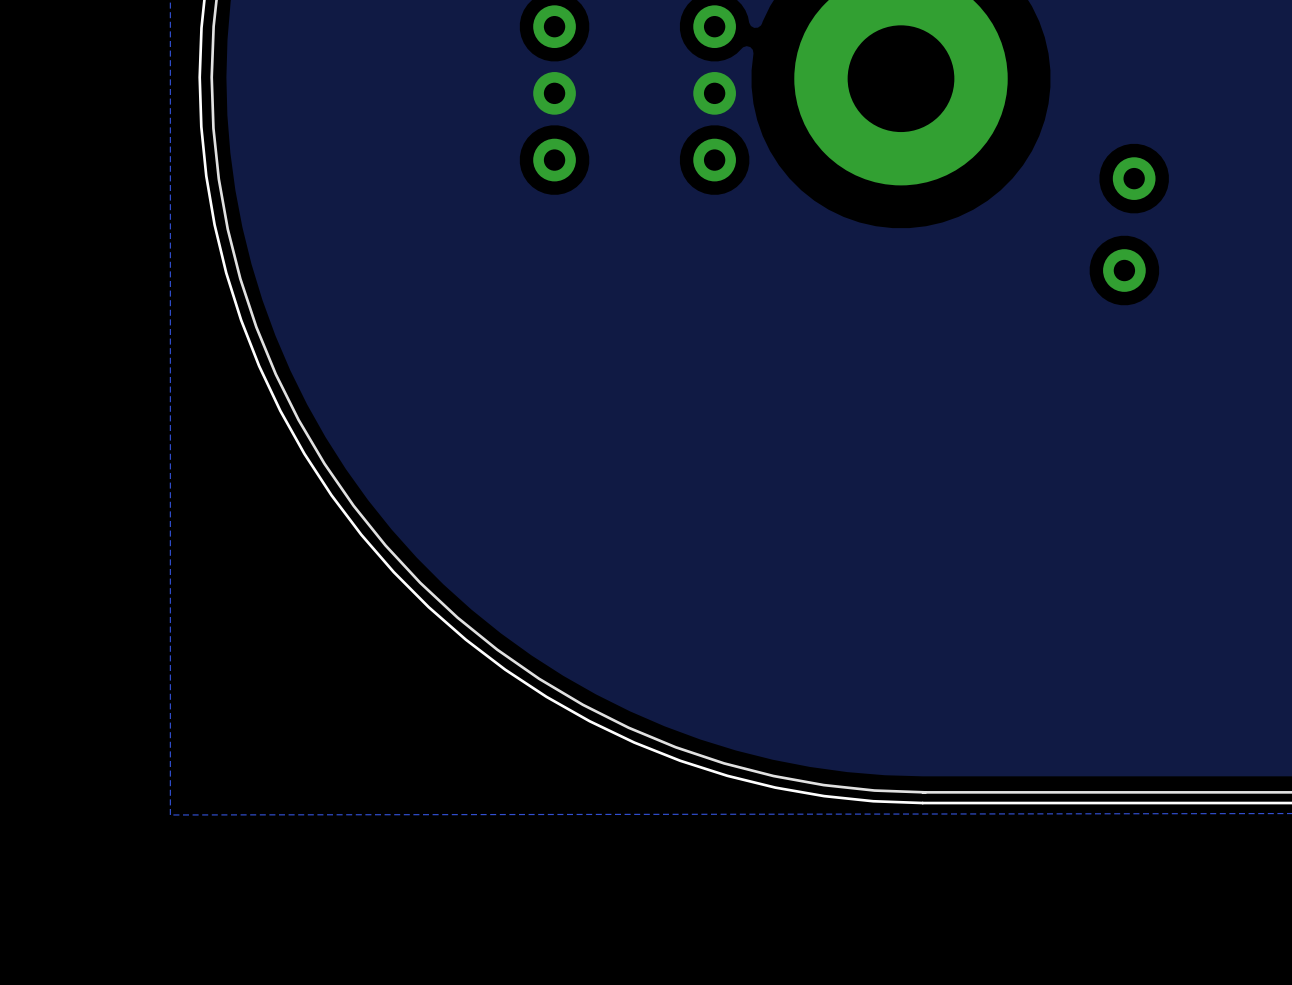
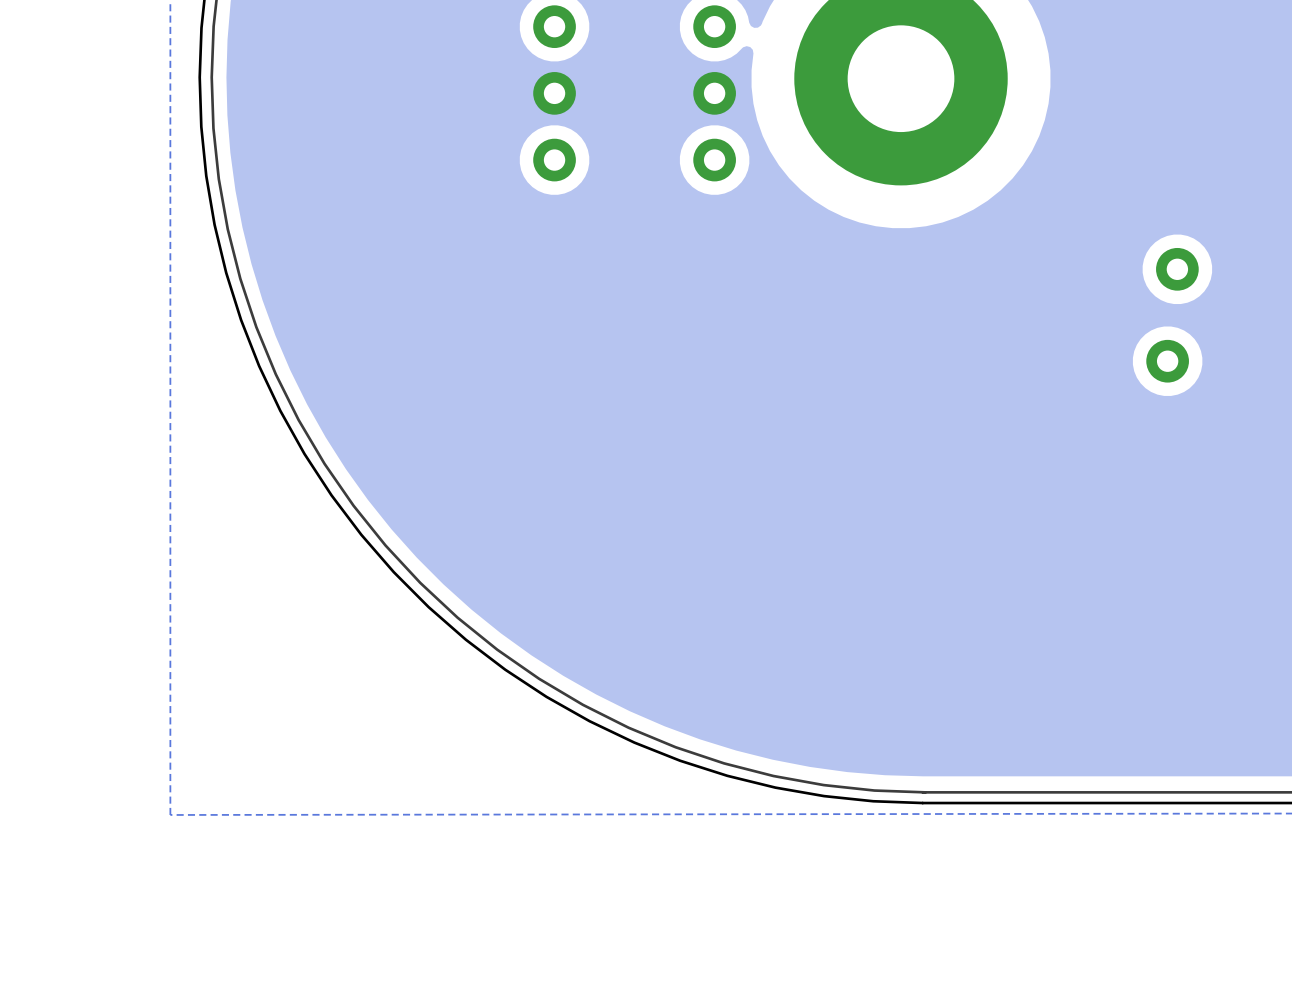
via: (1134, 178) -> none
via: none -> (1177, 269)
via: (1124, 270) -> none
via: none -> (1167, 361)

